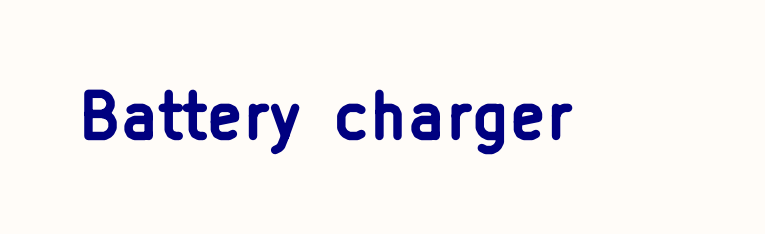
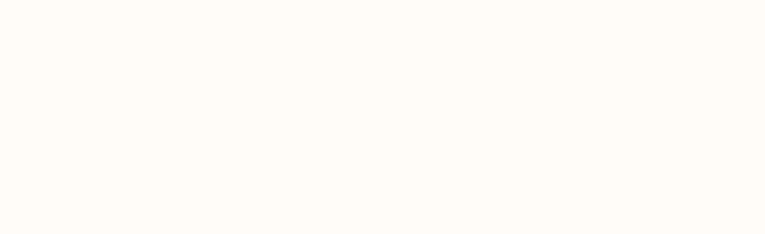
text: Battery charger (328, 121) -> none

